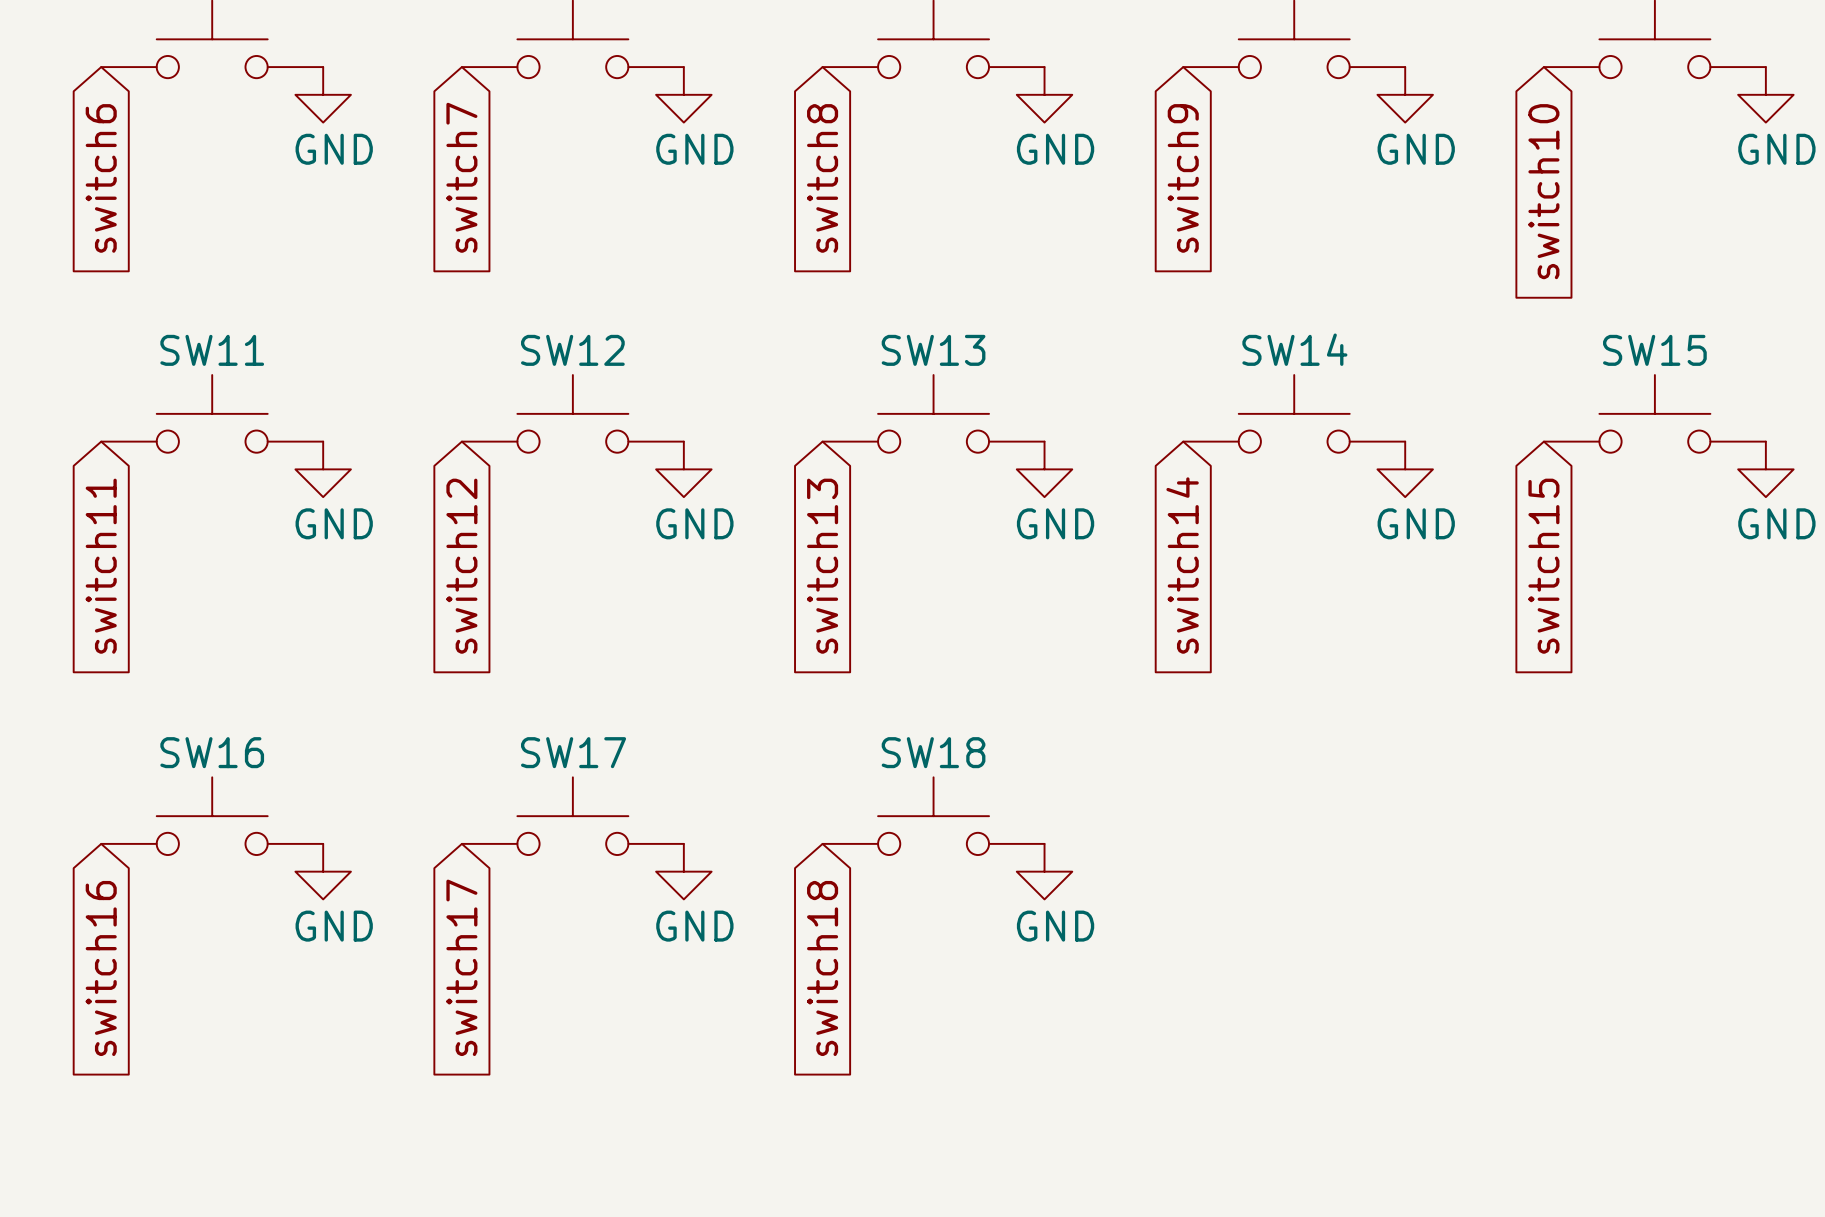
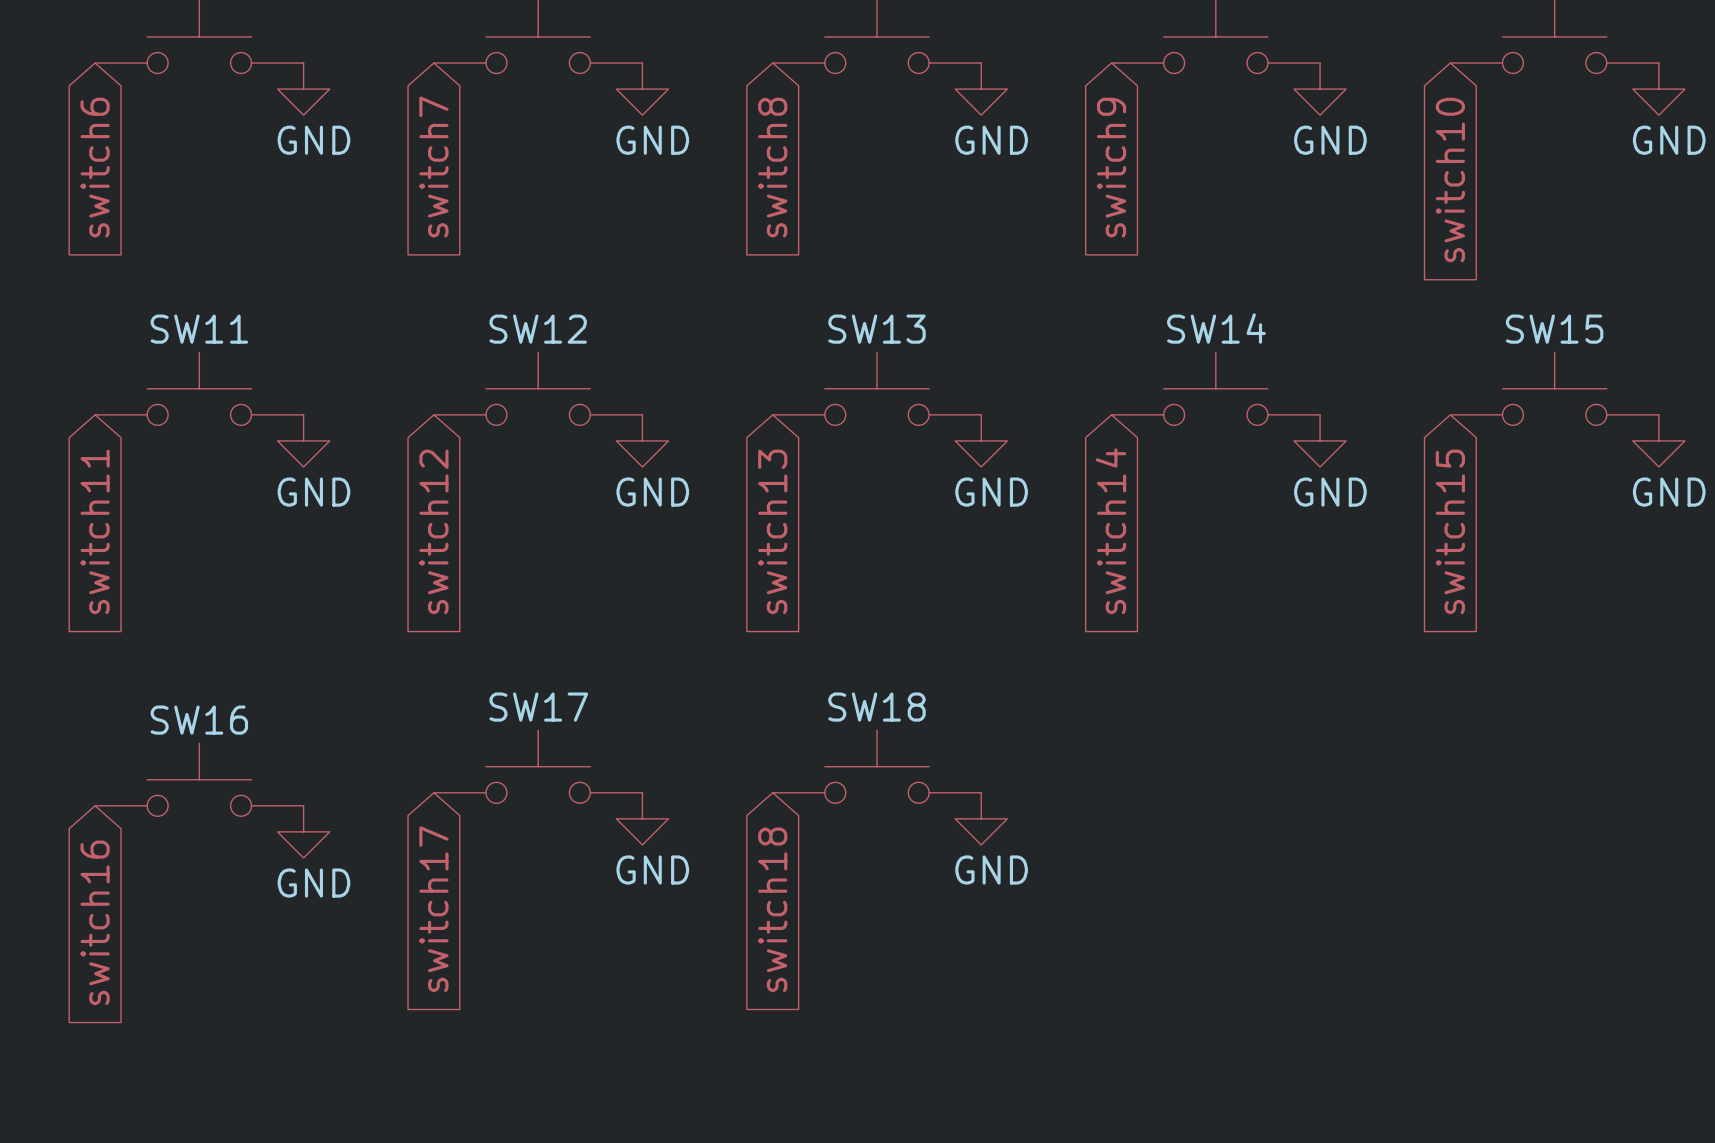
SW16 position: (212, 816) -> (199, 779)
power symbol position: GND (323, 871) -> GND (303, 831)
global label position: switch16 (101, 968) -> switch16 (95, 922)

